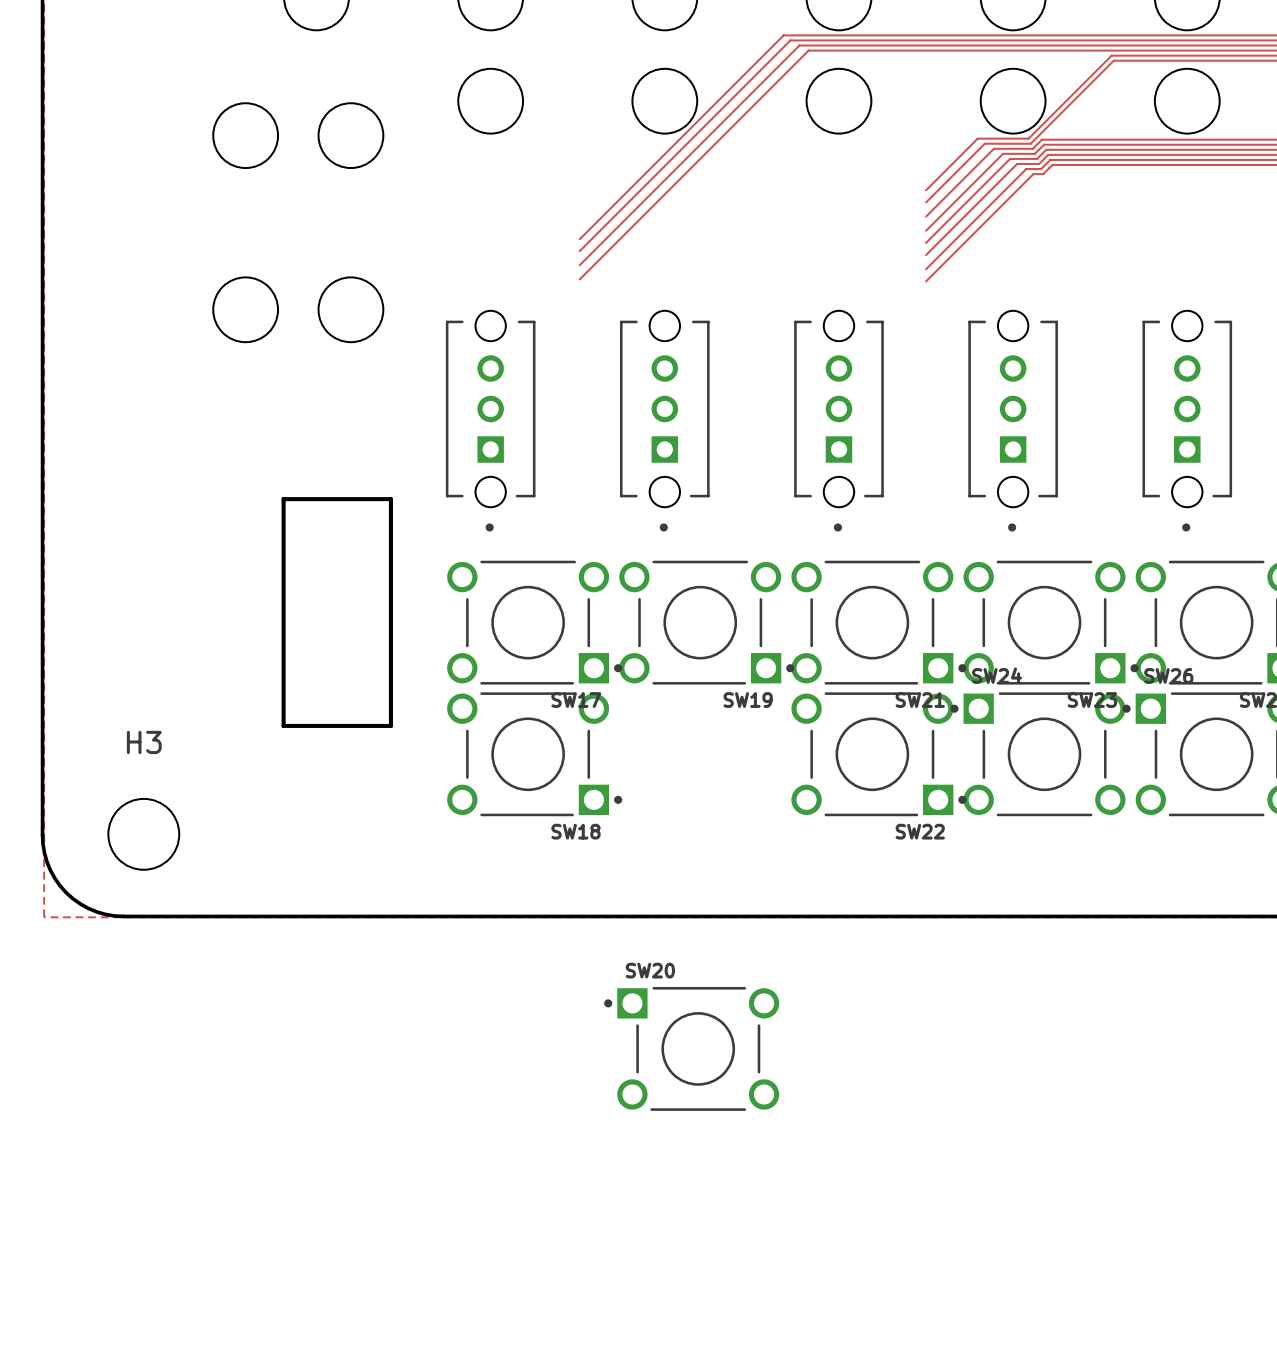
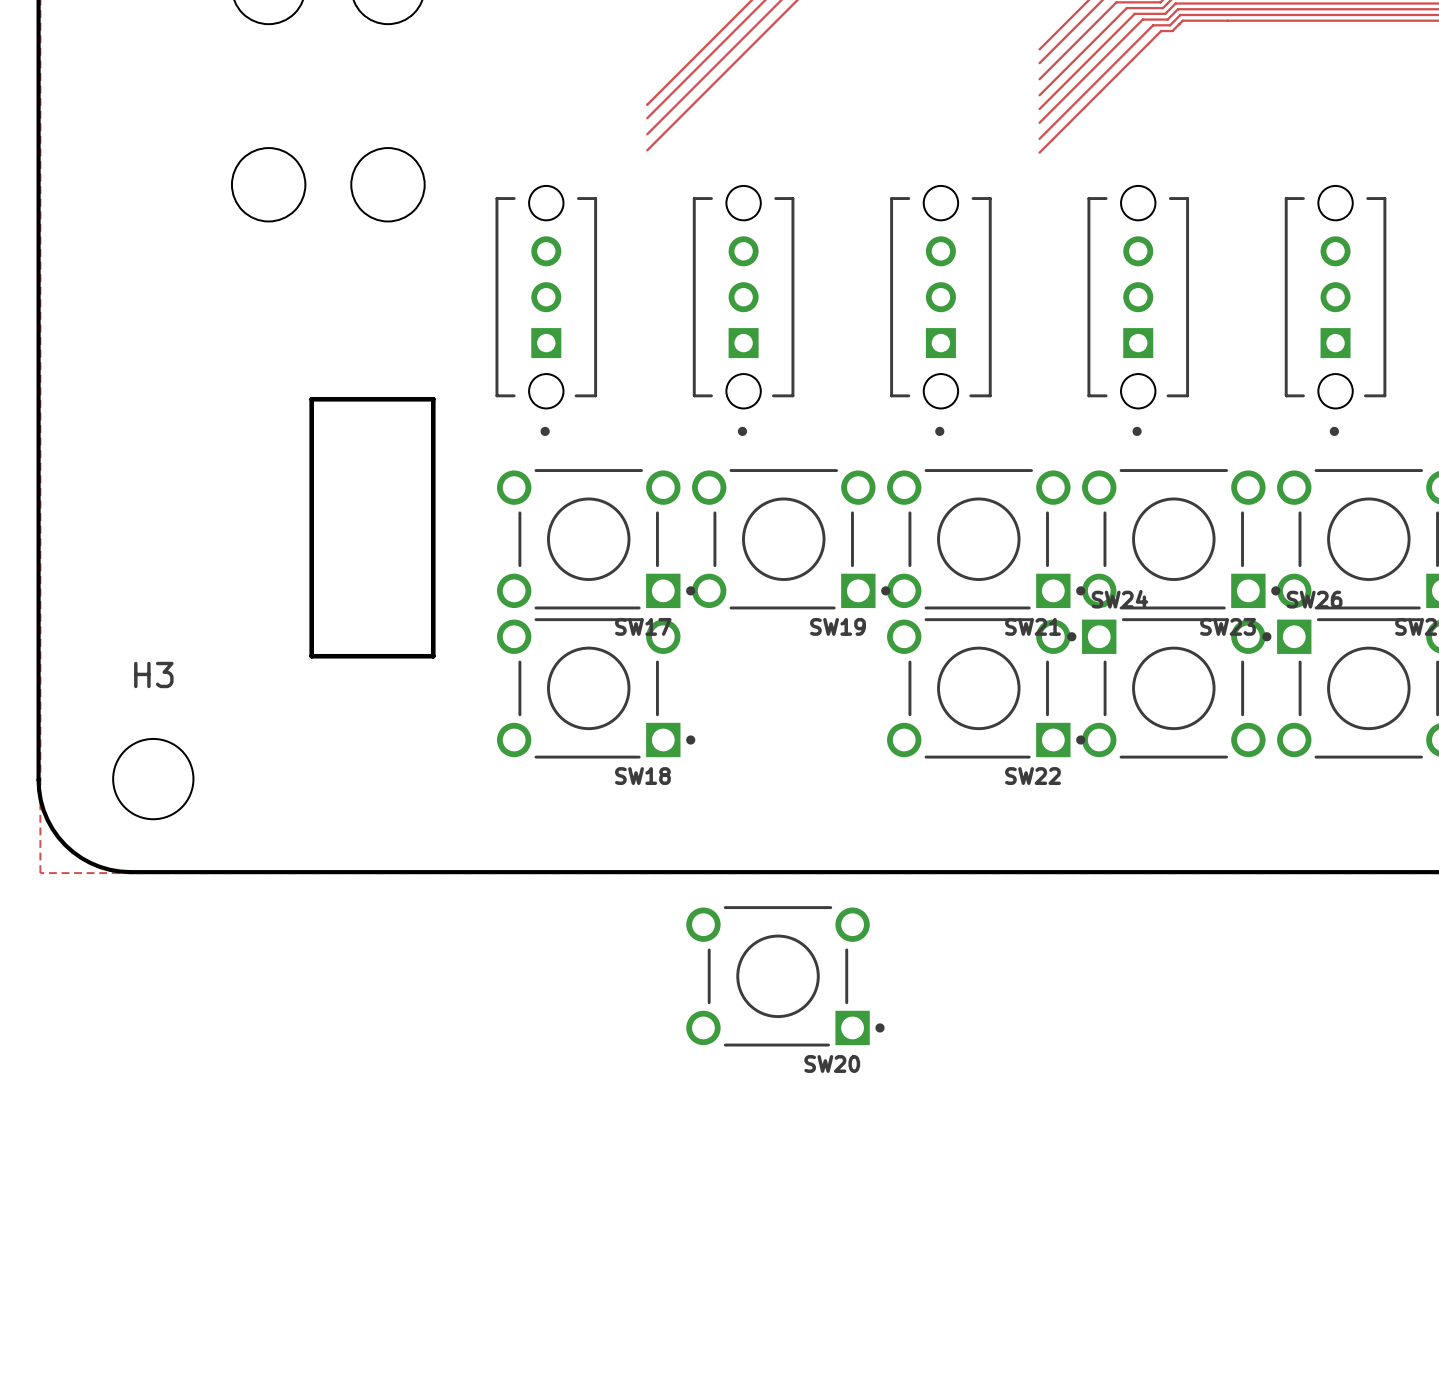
SW20 rotation: 0° (691, 1048) -> 180° (785, 976)

